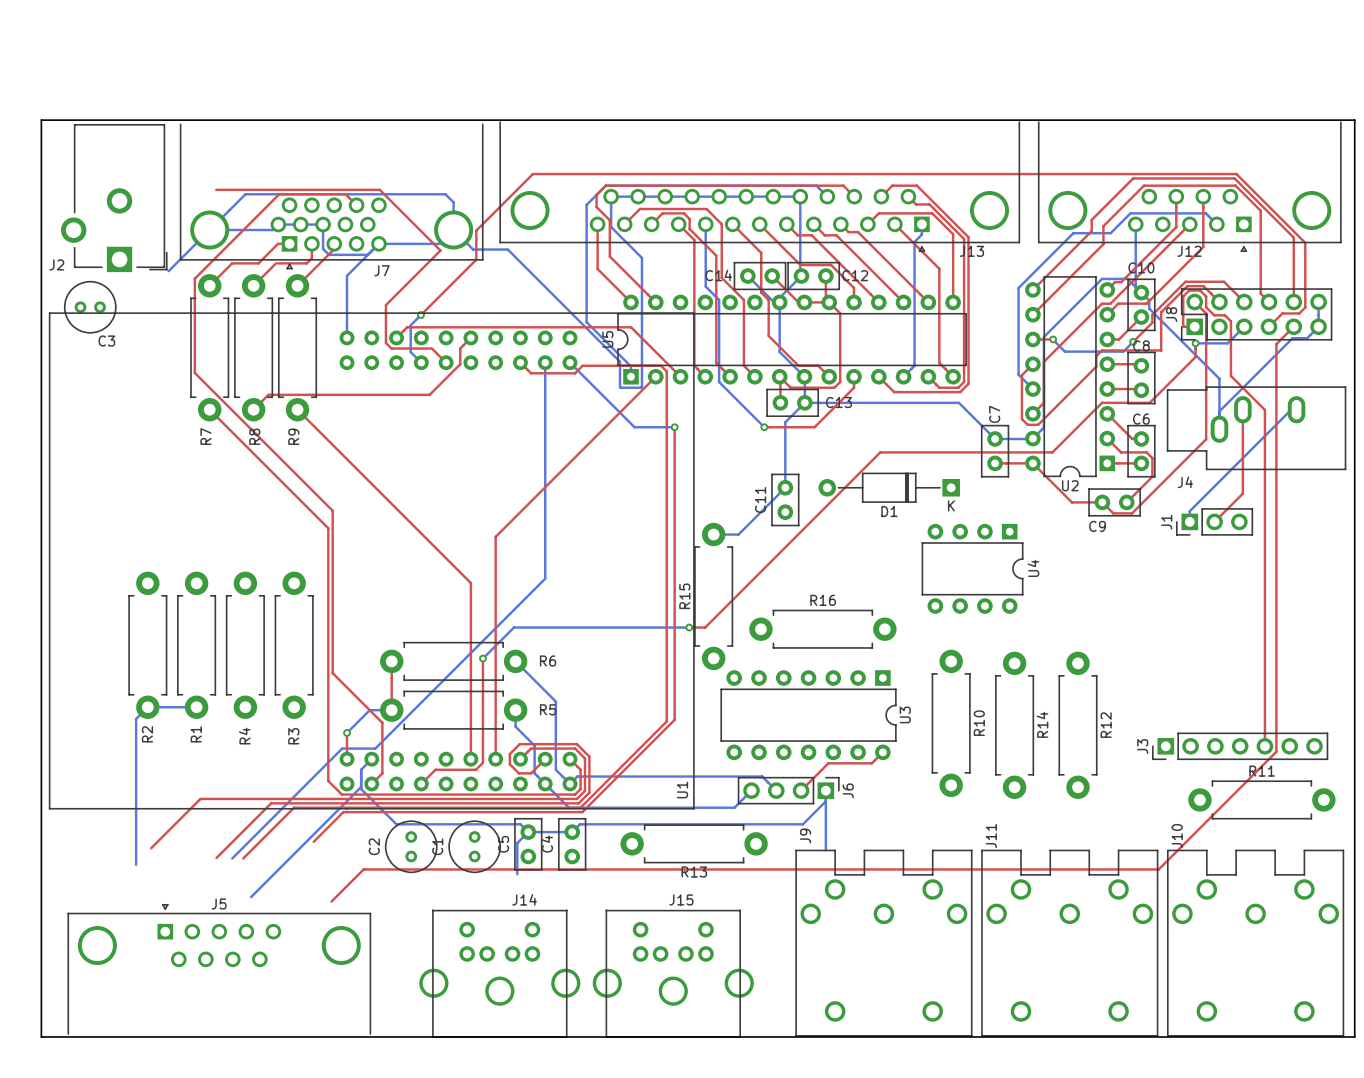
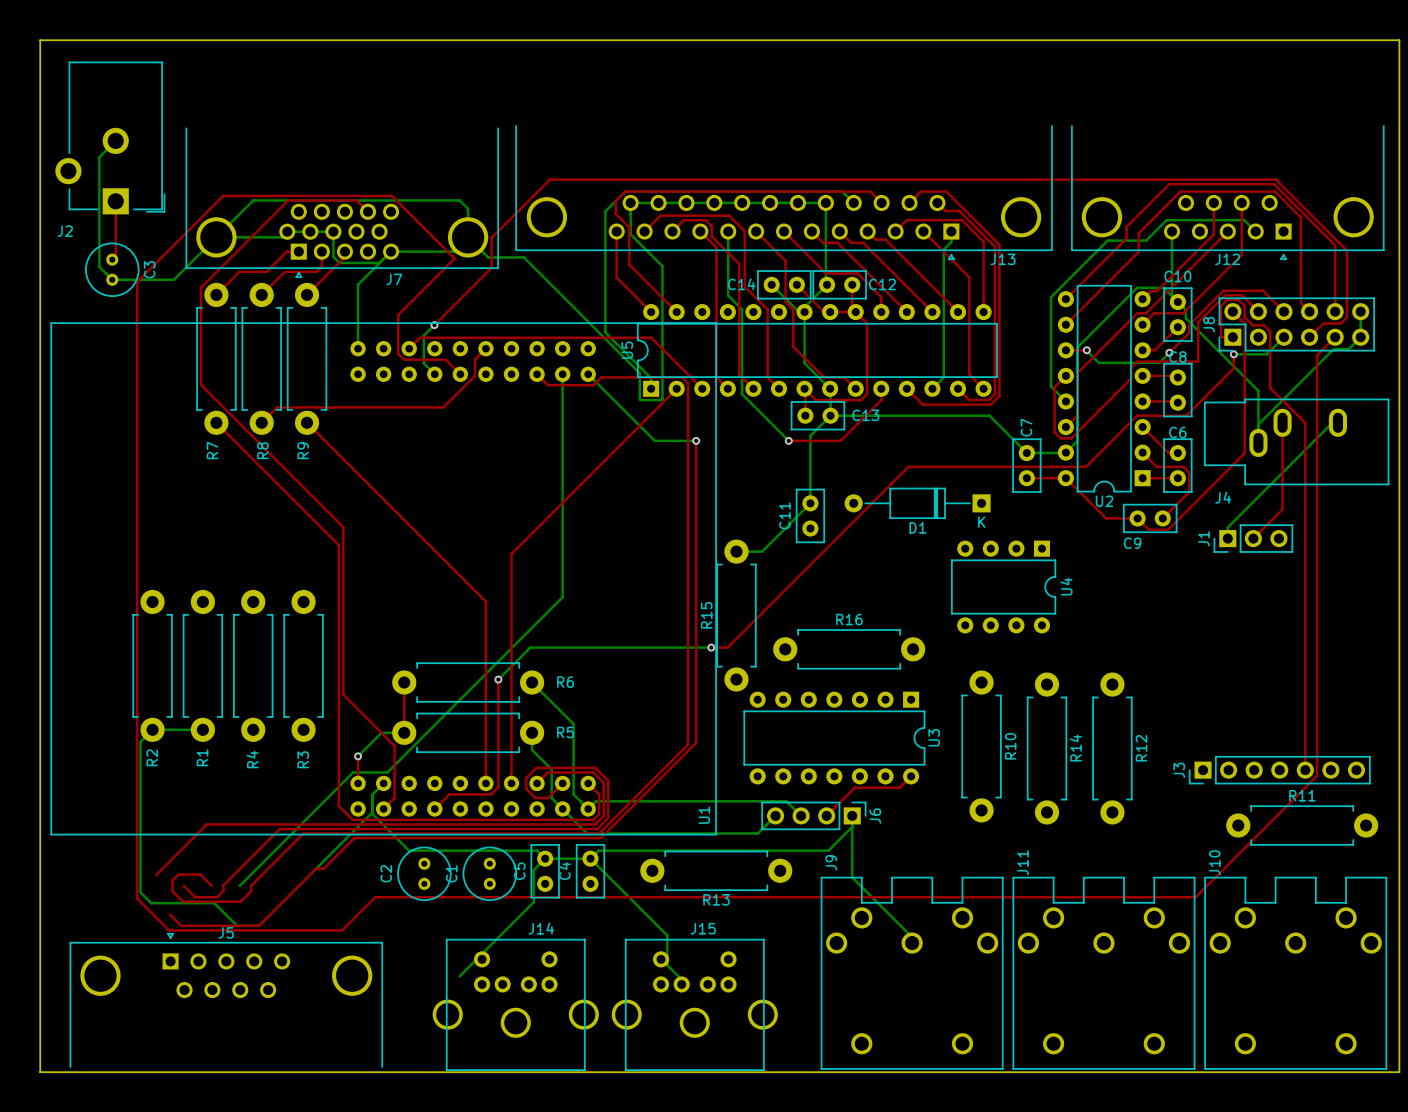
board edge: (41, 120) (1354, 120) (1354, 1036) (41, 1036) (41, 120) -> (40, 40) (40, 1072) (1399, 1072) (1399, 40) (40, 40)
bottom track: none -> (115, 140) (99, 157) (99, 266) (112, 279) (173, 279)
top track: none -> (223, 195) (137, 281) (137, 898) (169, 930) (342, 930)
top track: none -> (115, 201) (115, 256) (112, 259)
J2 position: (114, 198) -> (110, 138)
J2 name position: J2 (56, 264) -> J2 (65, 231)
C3 rotation: 0° (90, 307) -> 90° clockwise (112, 269)
C3 position: (90, 307) -> (112, 269)
C3 name position: C3 (106, 341) -> C3 (149, 269)
bottom track: none -> (590, 858) (667, 935) (667, 965) (678, 976)
top track: none -> (323, 868) (316, 868) (259, 925) (181, 925) (169, 914)
bottom track: none -> (852, 877) (911, 936)
top track: none -> (223, 885) (223, 890) (217, 897) (195, 897) (183, 885)
top track: none -> (211, 885) (200, 874) (178, 874) (172, 880) (172, 891) (183, 901) (240, 901) (251, 891) (251, 885)
bottom track: none -> (140, 892) (151, 903) (214, 903) (237, 925) (259, 925)
bottom track: none -> (533, 902) (459, 976)

